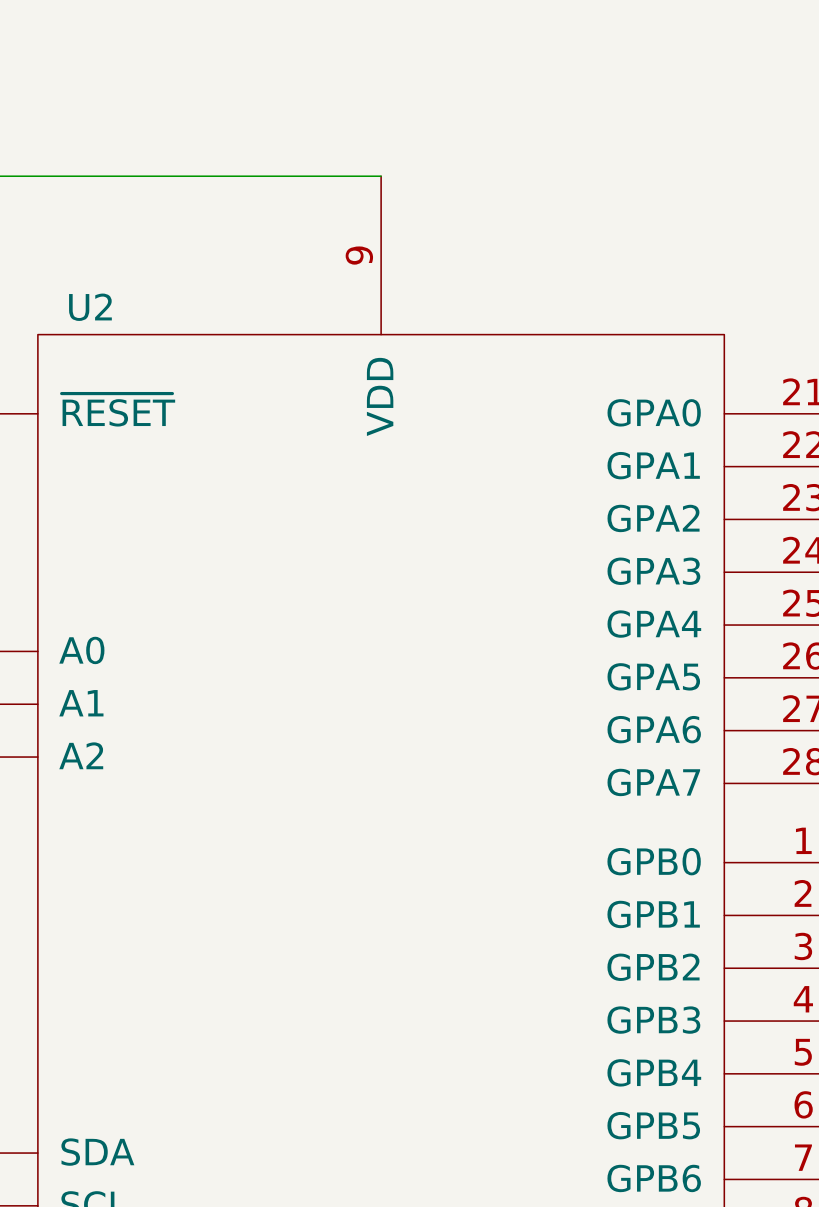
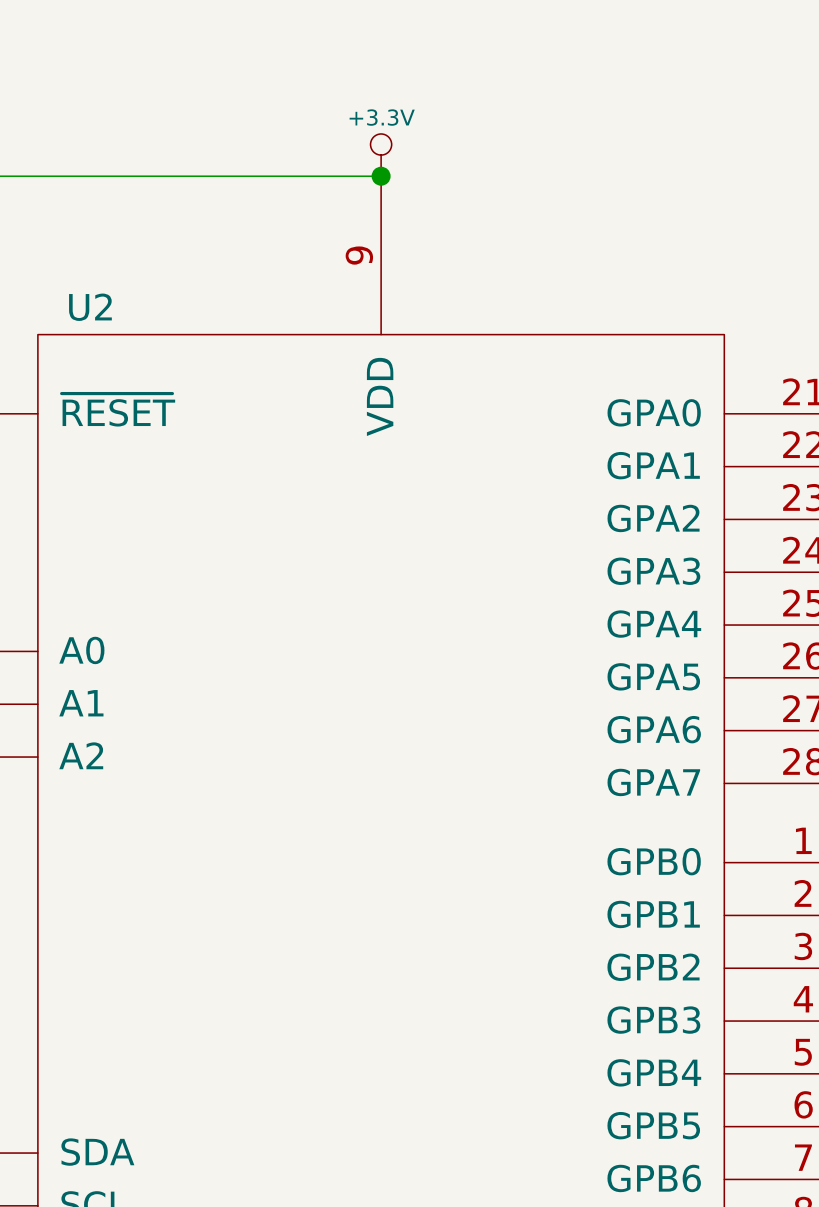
power symbol: none -> +3.3V (381, 155)
junction: none -> (381, 176)

